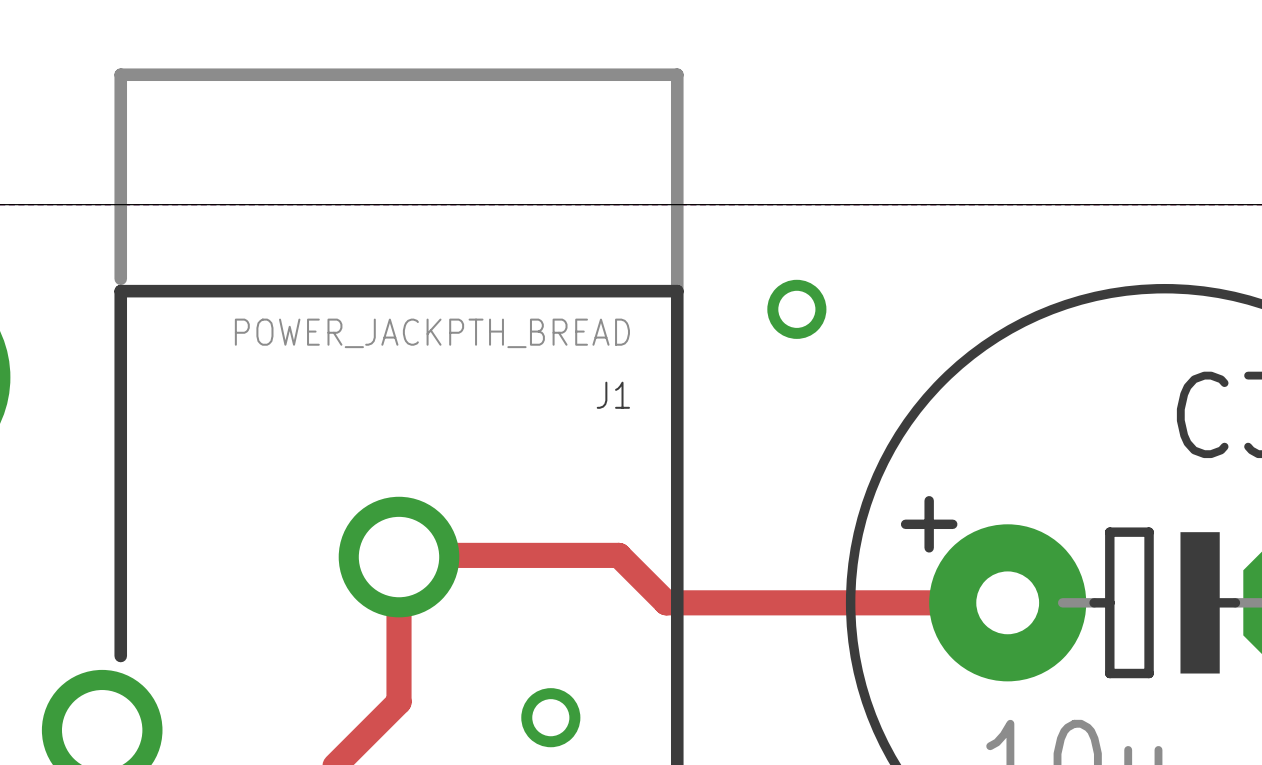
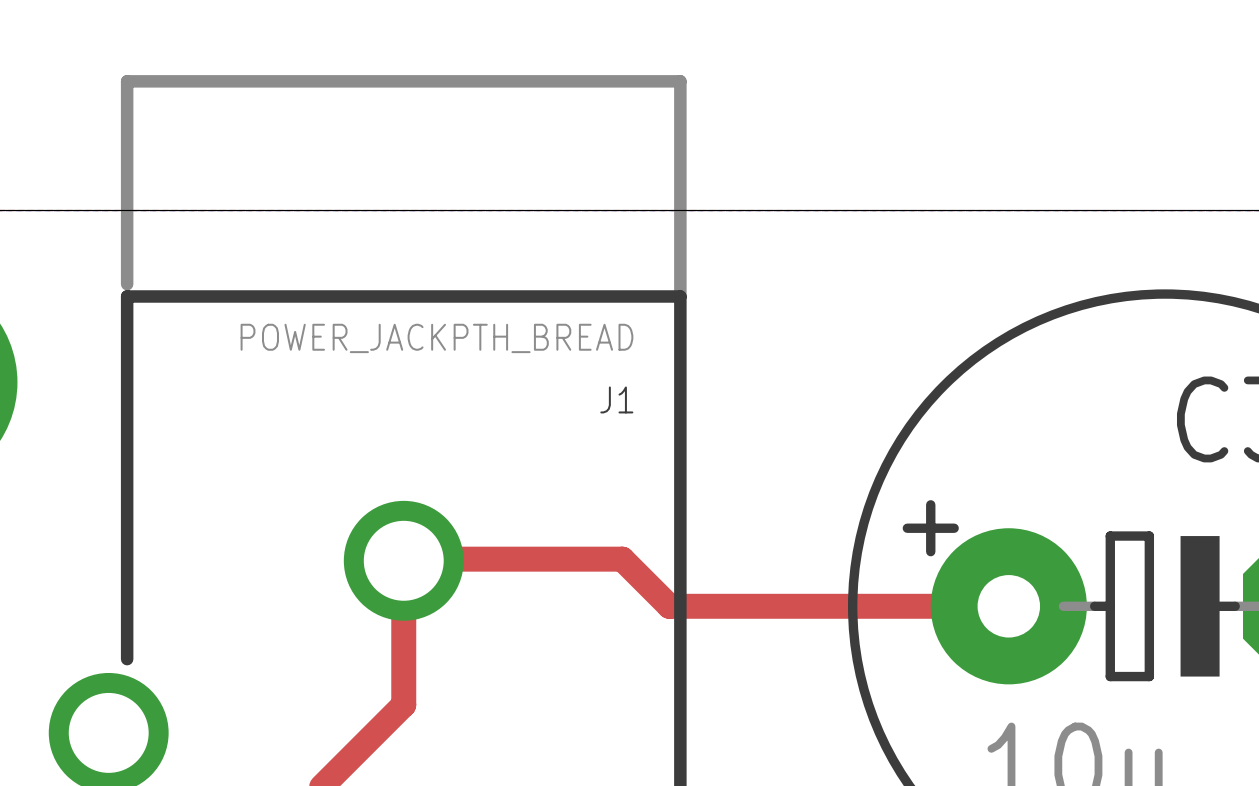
via: (796, 309) -> none
via: (550, 717) -> none

